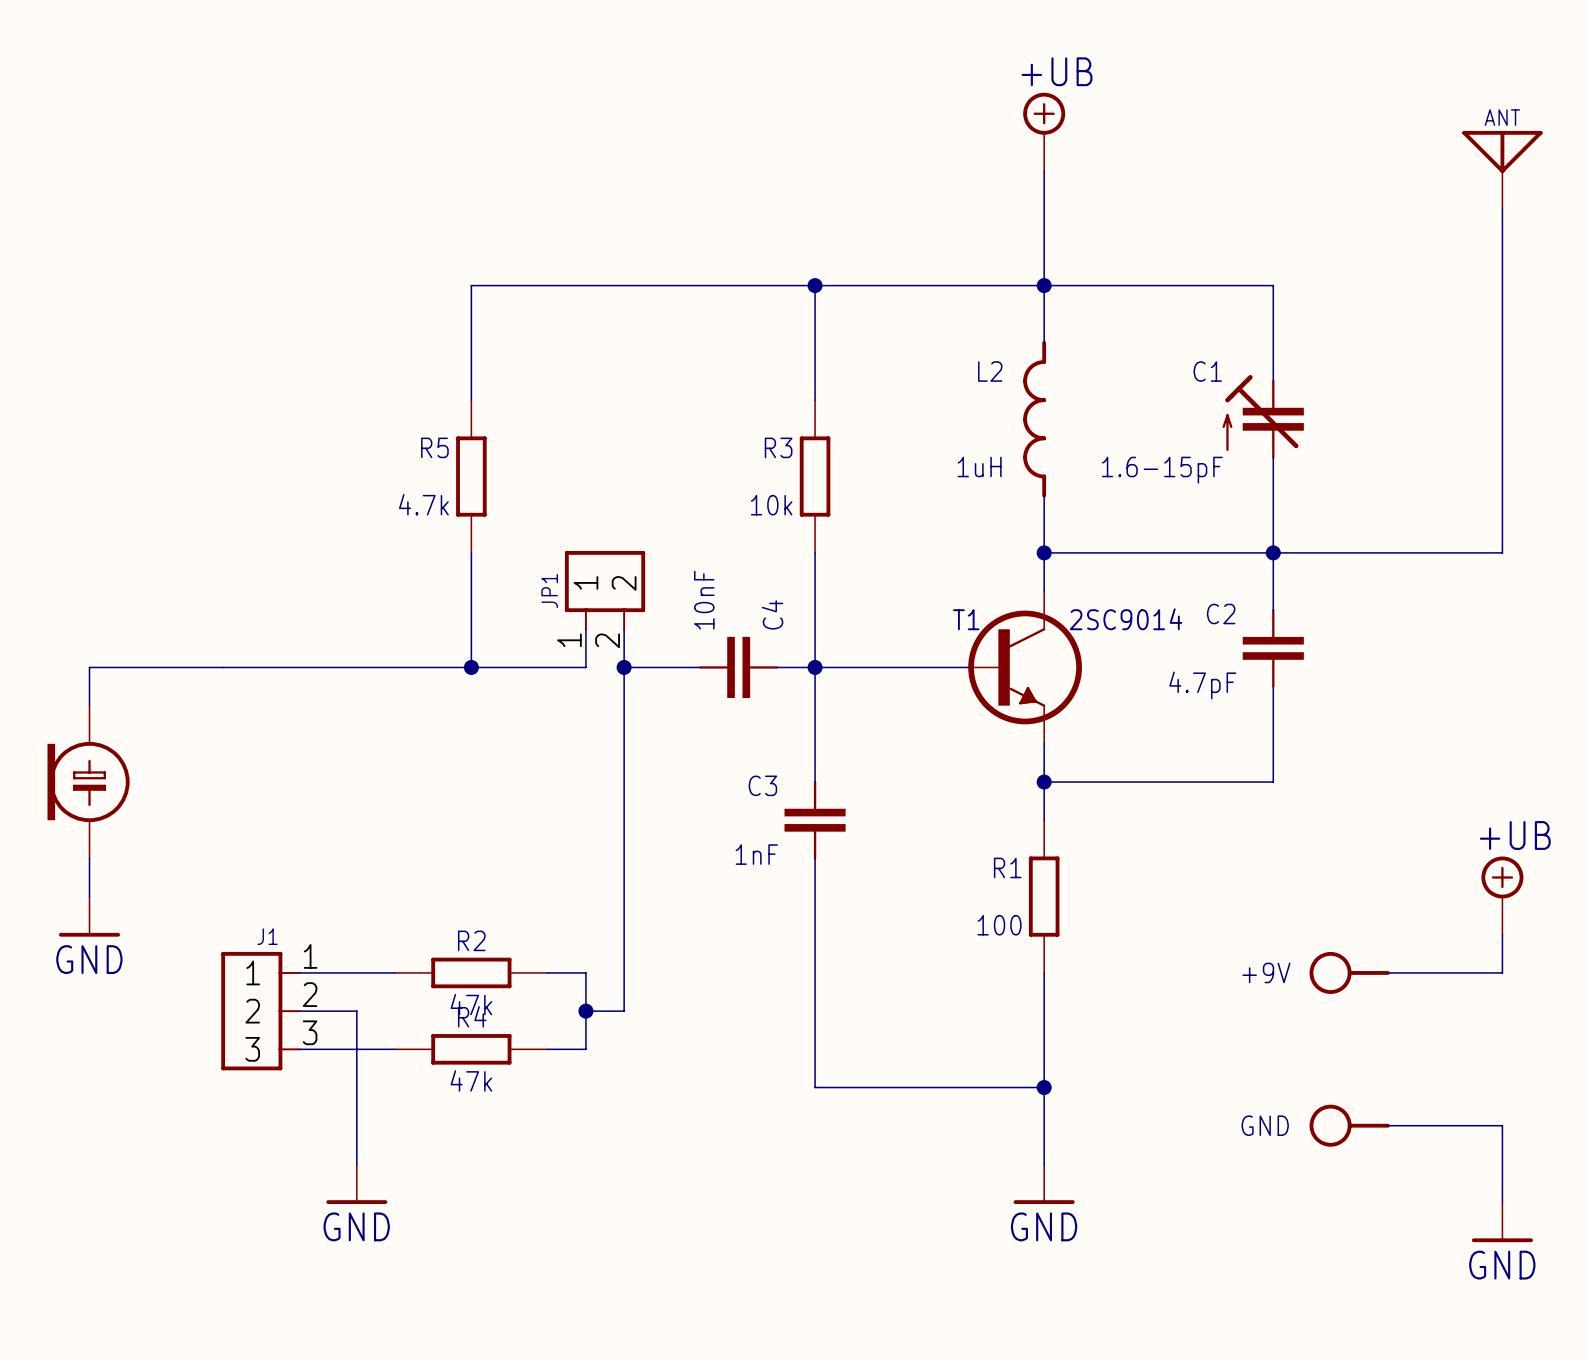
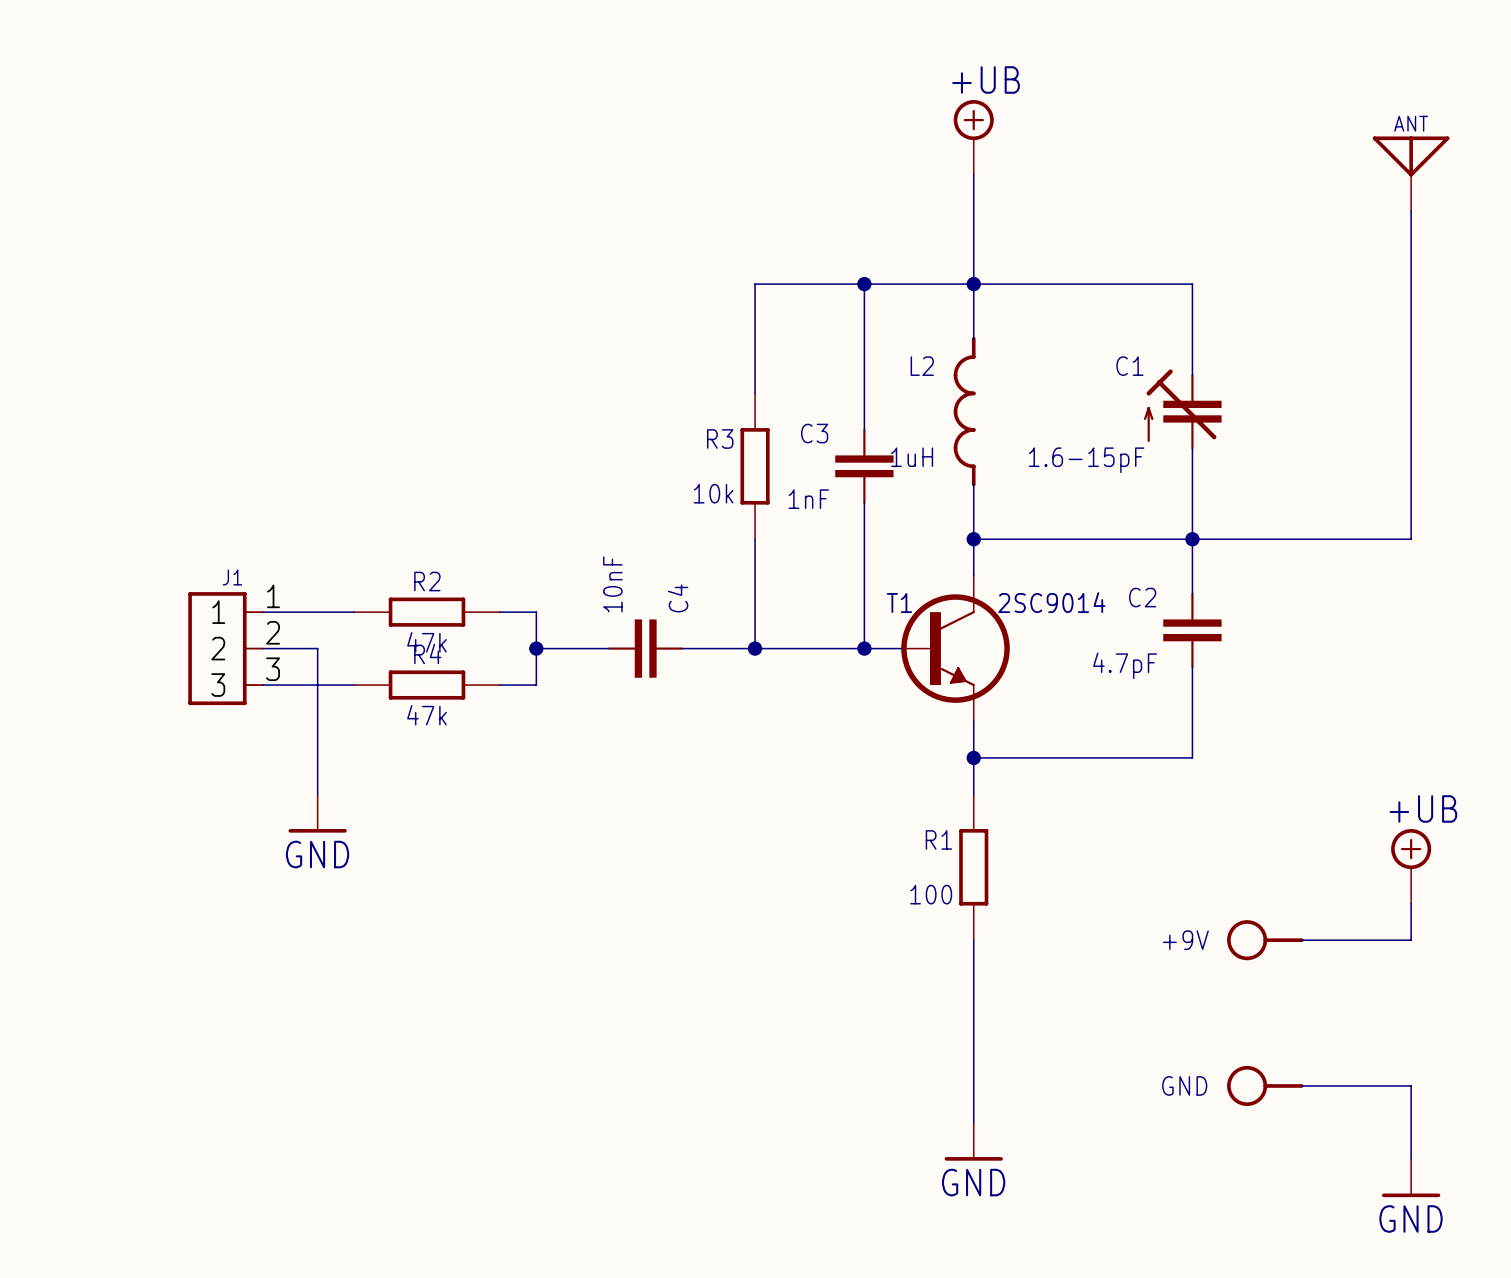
wire: (815, 285) (471, 285) (471, 400) -> none
junction: (815, 285) -> none
wire: none -> (864, 284) (864, 429)
junction: none -> (864, 284)
R5: 4.7k (471, 476) -> none
wire: none -> (864, 502) (864, 648)
wire: (471, 552) (471, 667) -> none
JP1: (605, 590) -> none
wire: none -> (499, 612) (536, 612)
wire: (624, 629) (624, 1011) (585, 1011) -> none
wire: (299, 667) (89, 667) (89, 705) -> none
wire: (356, 667) (585, 667) -> (317, 648) (317, 794)
junction: (471, 667) -> none
wire: none -> (572, 648) (536, 648) (536, 685) (499, 685)
junction position: (624, 667) -> (536, 648)
C4 position: (738, 667) -> (645, 648)
wire: (815, 667) (815, 782) -> none
junction: none -> (864, 648)
part: (88, 782) -> none
C3 position: (815, 820) -> (864, 466)
power symbol: none -> GND (317, 813)
wire: (89, 858) (89, 896) -> none
wire: (815, 858) (815, 1087) (1044, 1087) -> none
power symbol: GND (89, 916) -> none
wire: (299, 972) (395, 972) -> (262, 612) (354, 612)
R2 position: (471, 972) -> (427, 612)
wire: (547, 972) (585, 972) (585, 1049) (547, 1049) -> none
J1 position: (260, 1011) -> (226, 648)
wire: (299, 1011) (356, 1011) (356, 1163) -> none
junction: (585, 1011) -> none
wire: (299, 1049) (395, 1049) -> (262, 685) (354, 685)
R4 position: (471, 1049) -> (427, 685)
junction: (1044, 1087) -> none
power symbol: GND (356, 1183) -> none

